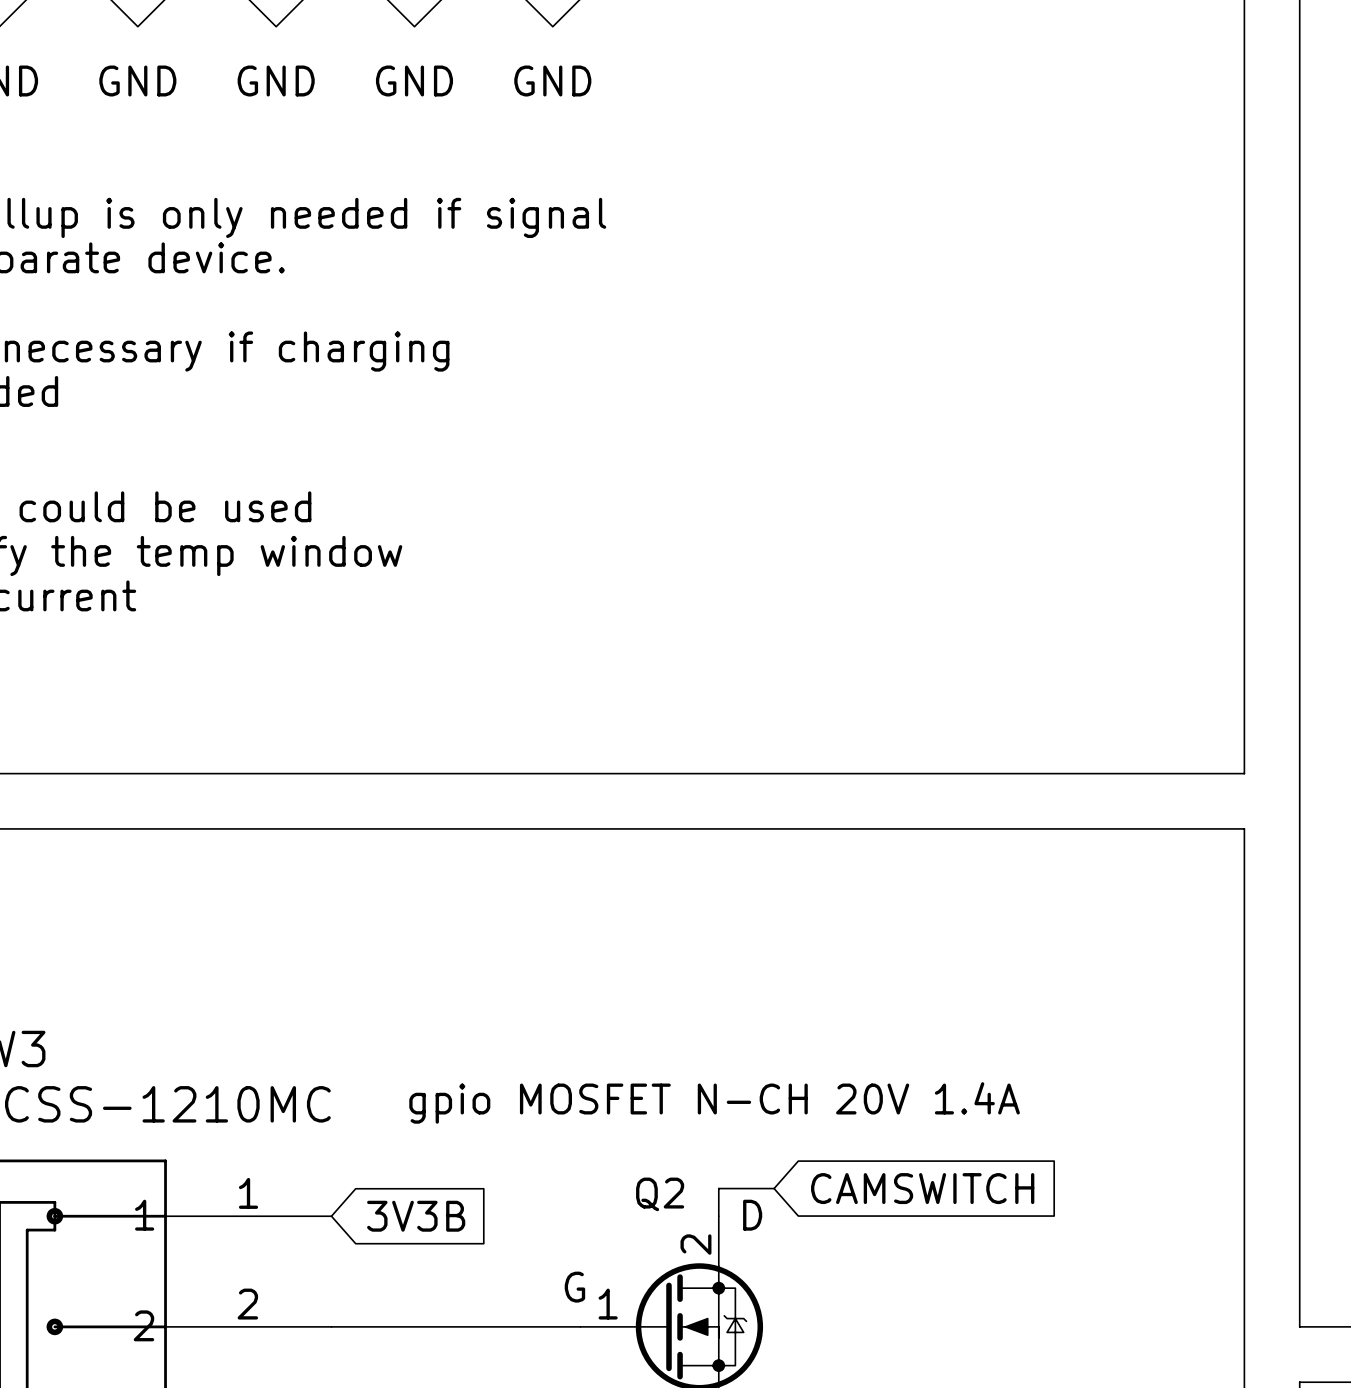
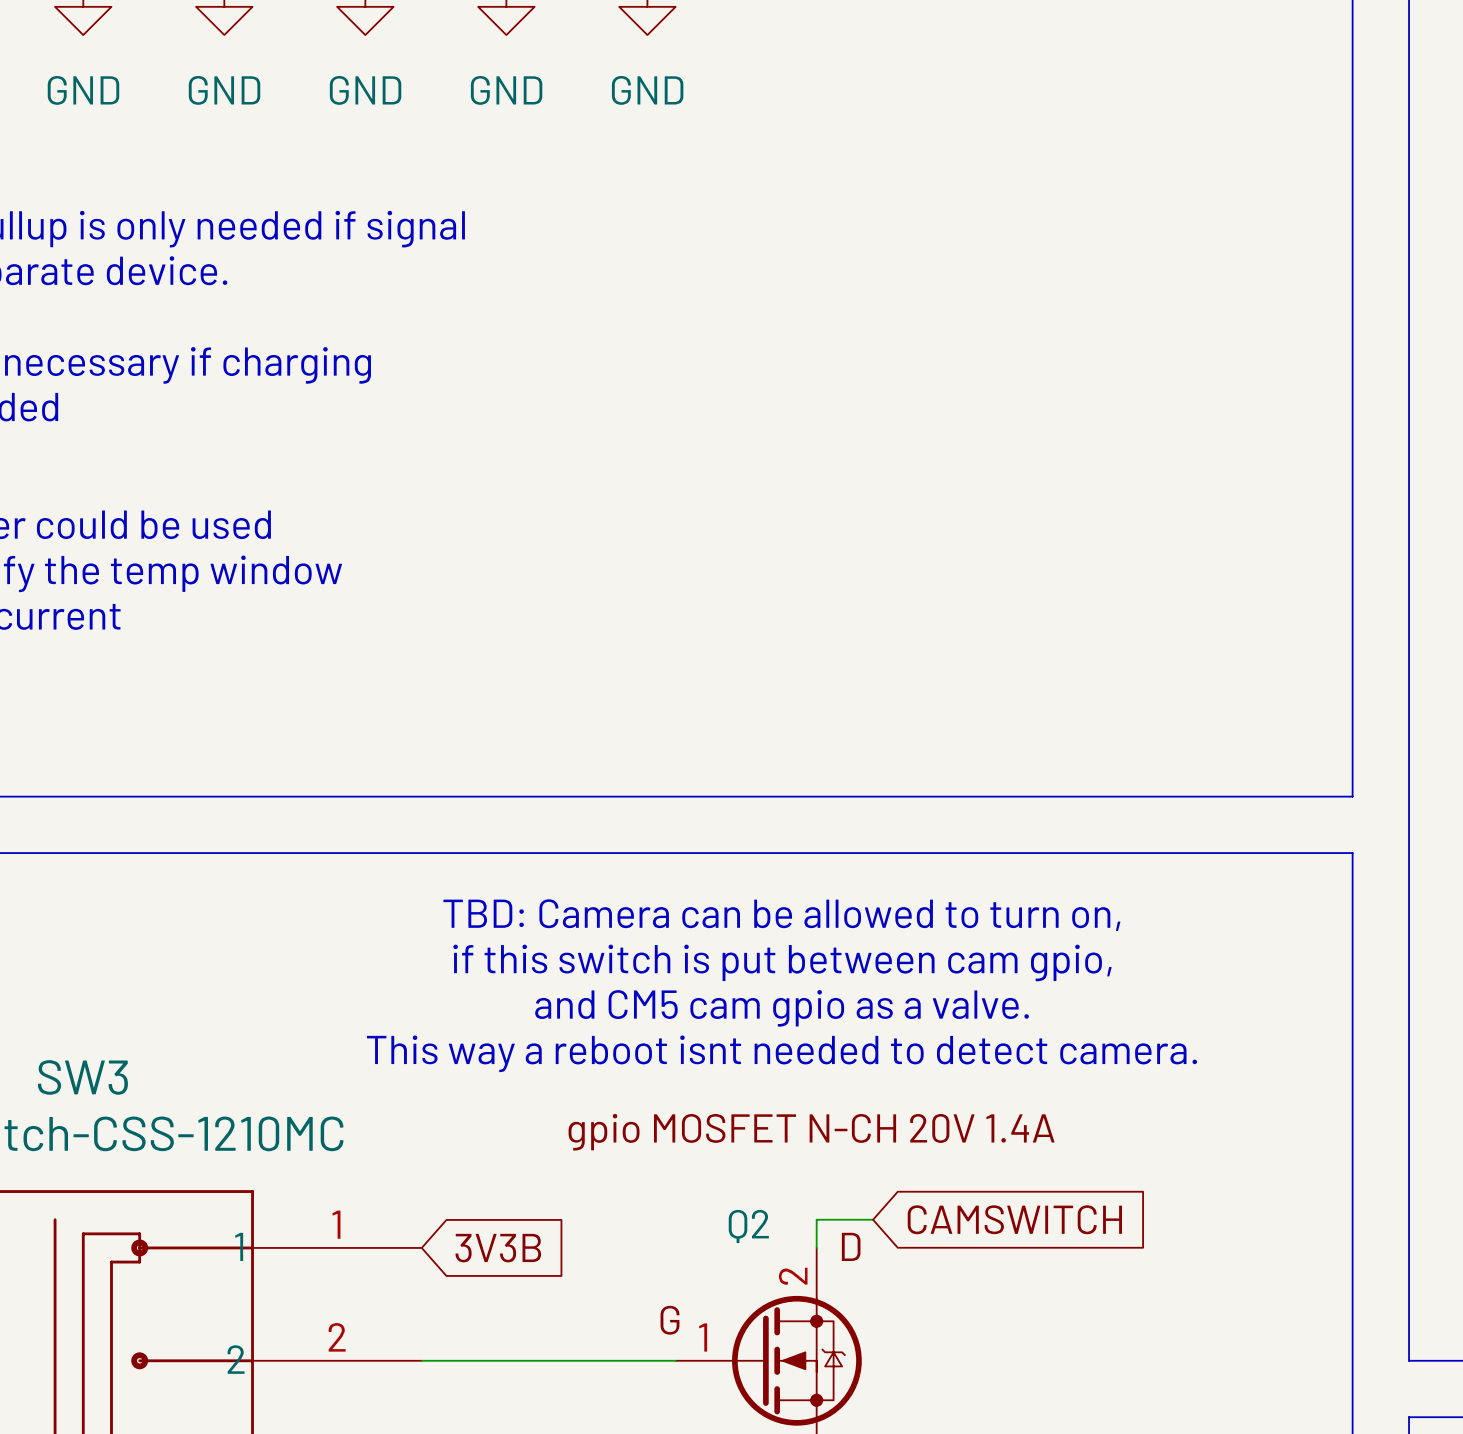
text: none -> TBD: Camera can be allowed to turn on, (781, 915)
text: none -> if this switch is put between cam gpio, (782, 962)
text: none -> and CM5 cam gpio as a valve. (782, 1008)
text: none -> This way a reboot isnt needed to detect camera. (781, 1053)

